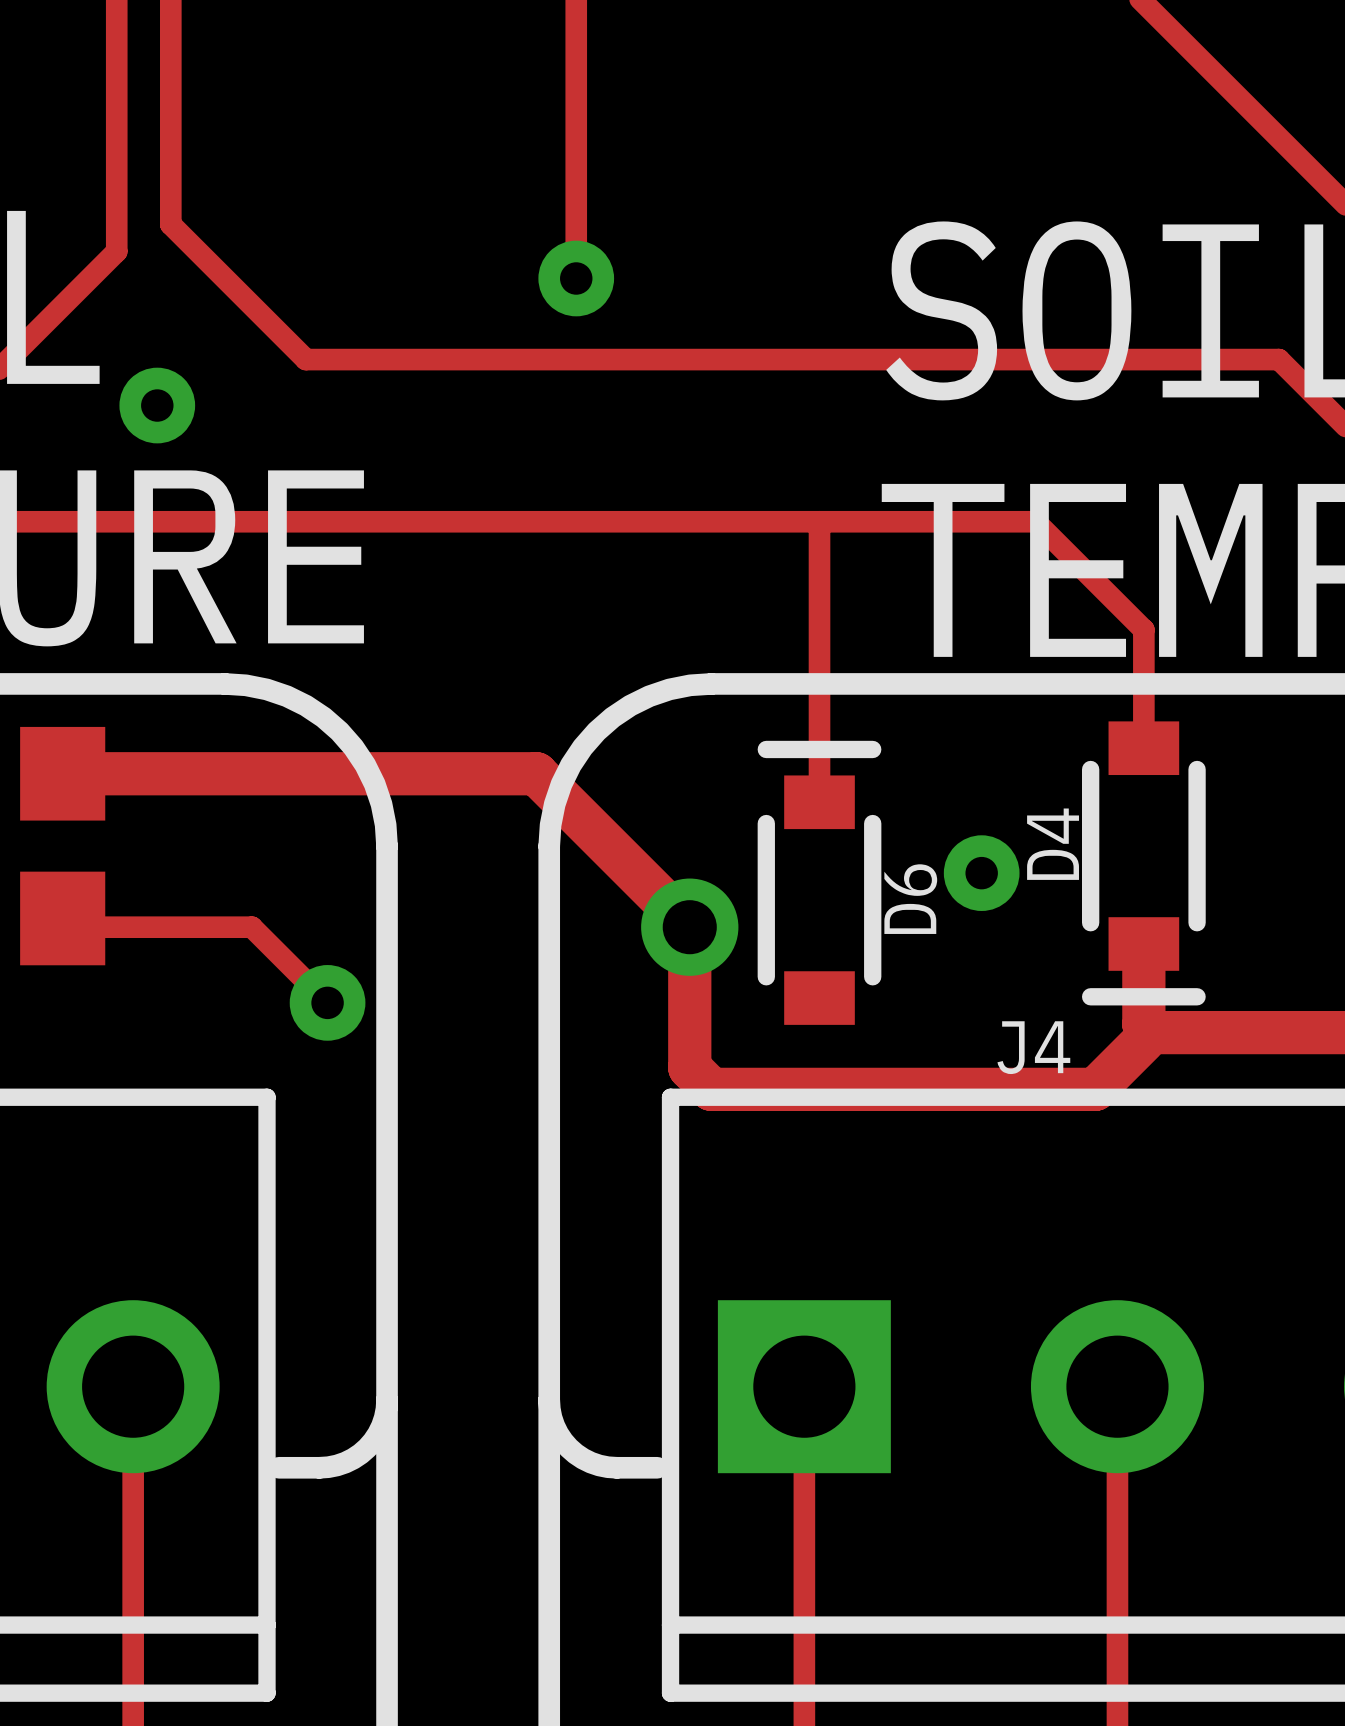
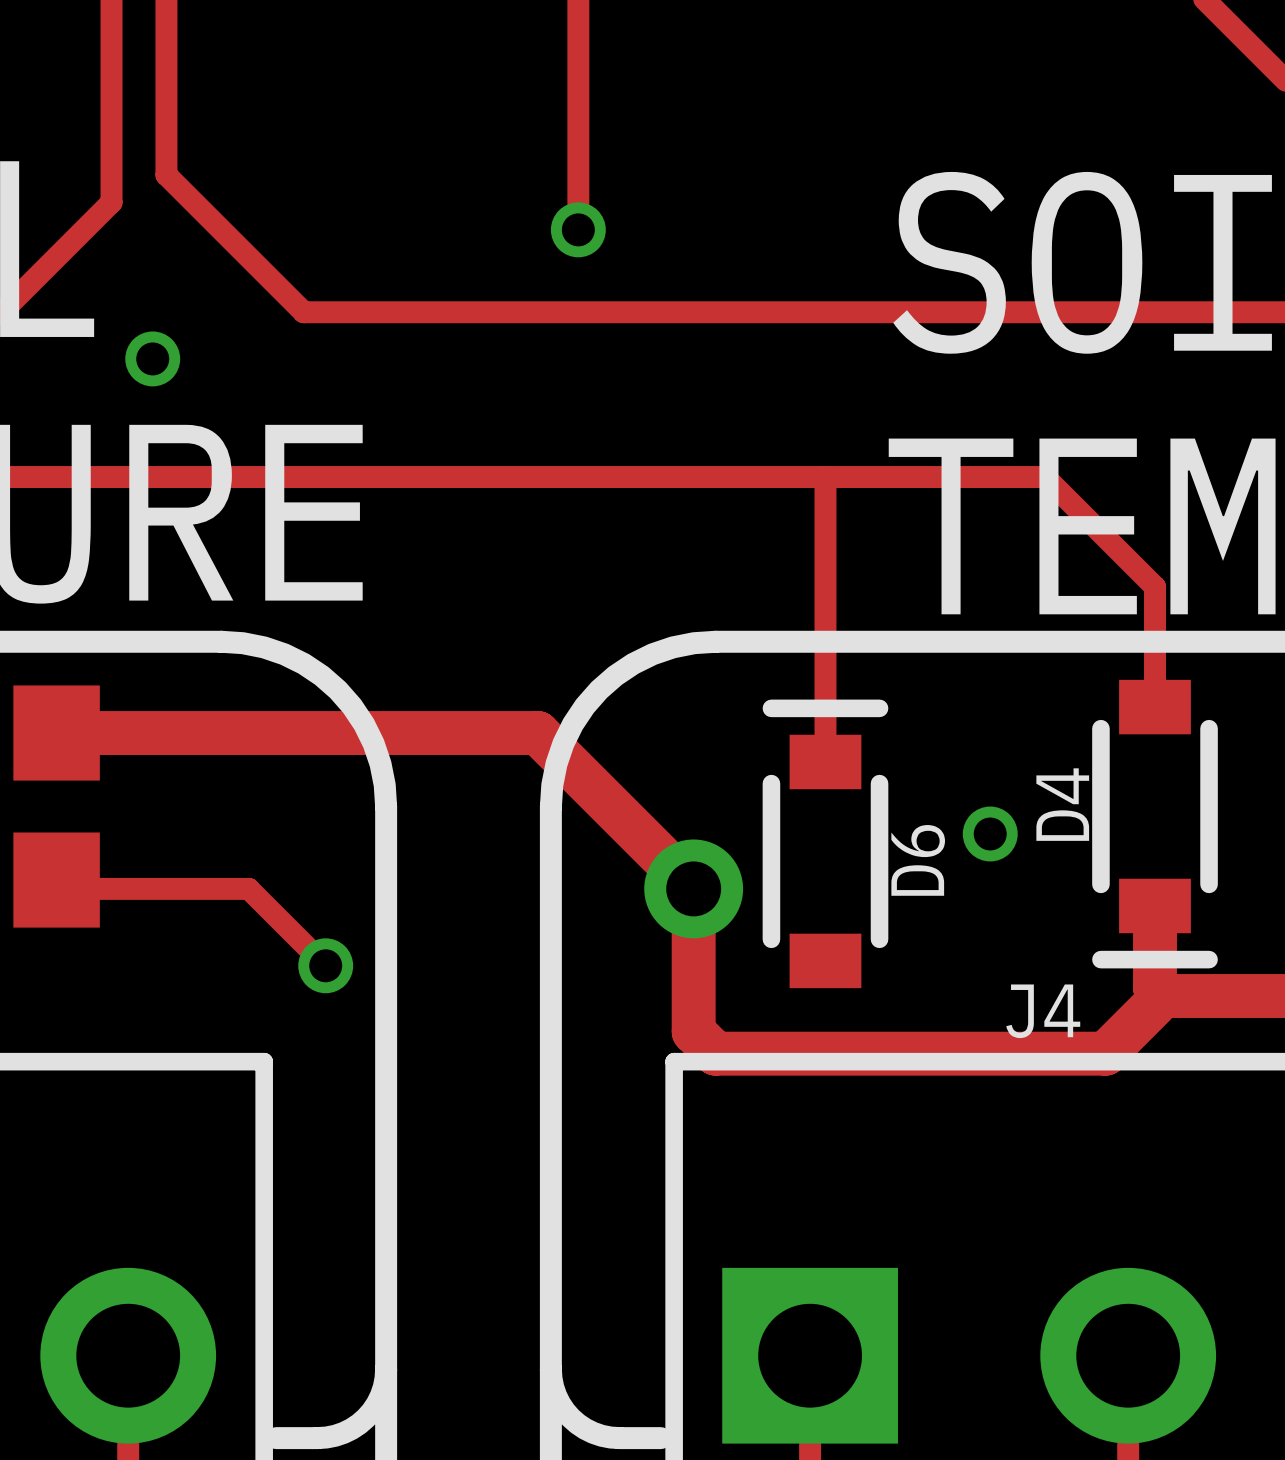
via size: [538, 240, 615, 317] -> [550, 202, 606, 258]
via size: [119, 367, 196, 444] -> [125, 331, 181, 387]
via size: [943, 835, 1020, 911] -> [962, 806, 1018, 862]
via size: [289, 965, 366, 1041] -> [298, 938, 354, 994]

